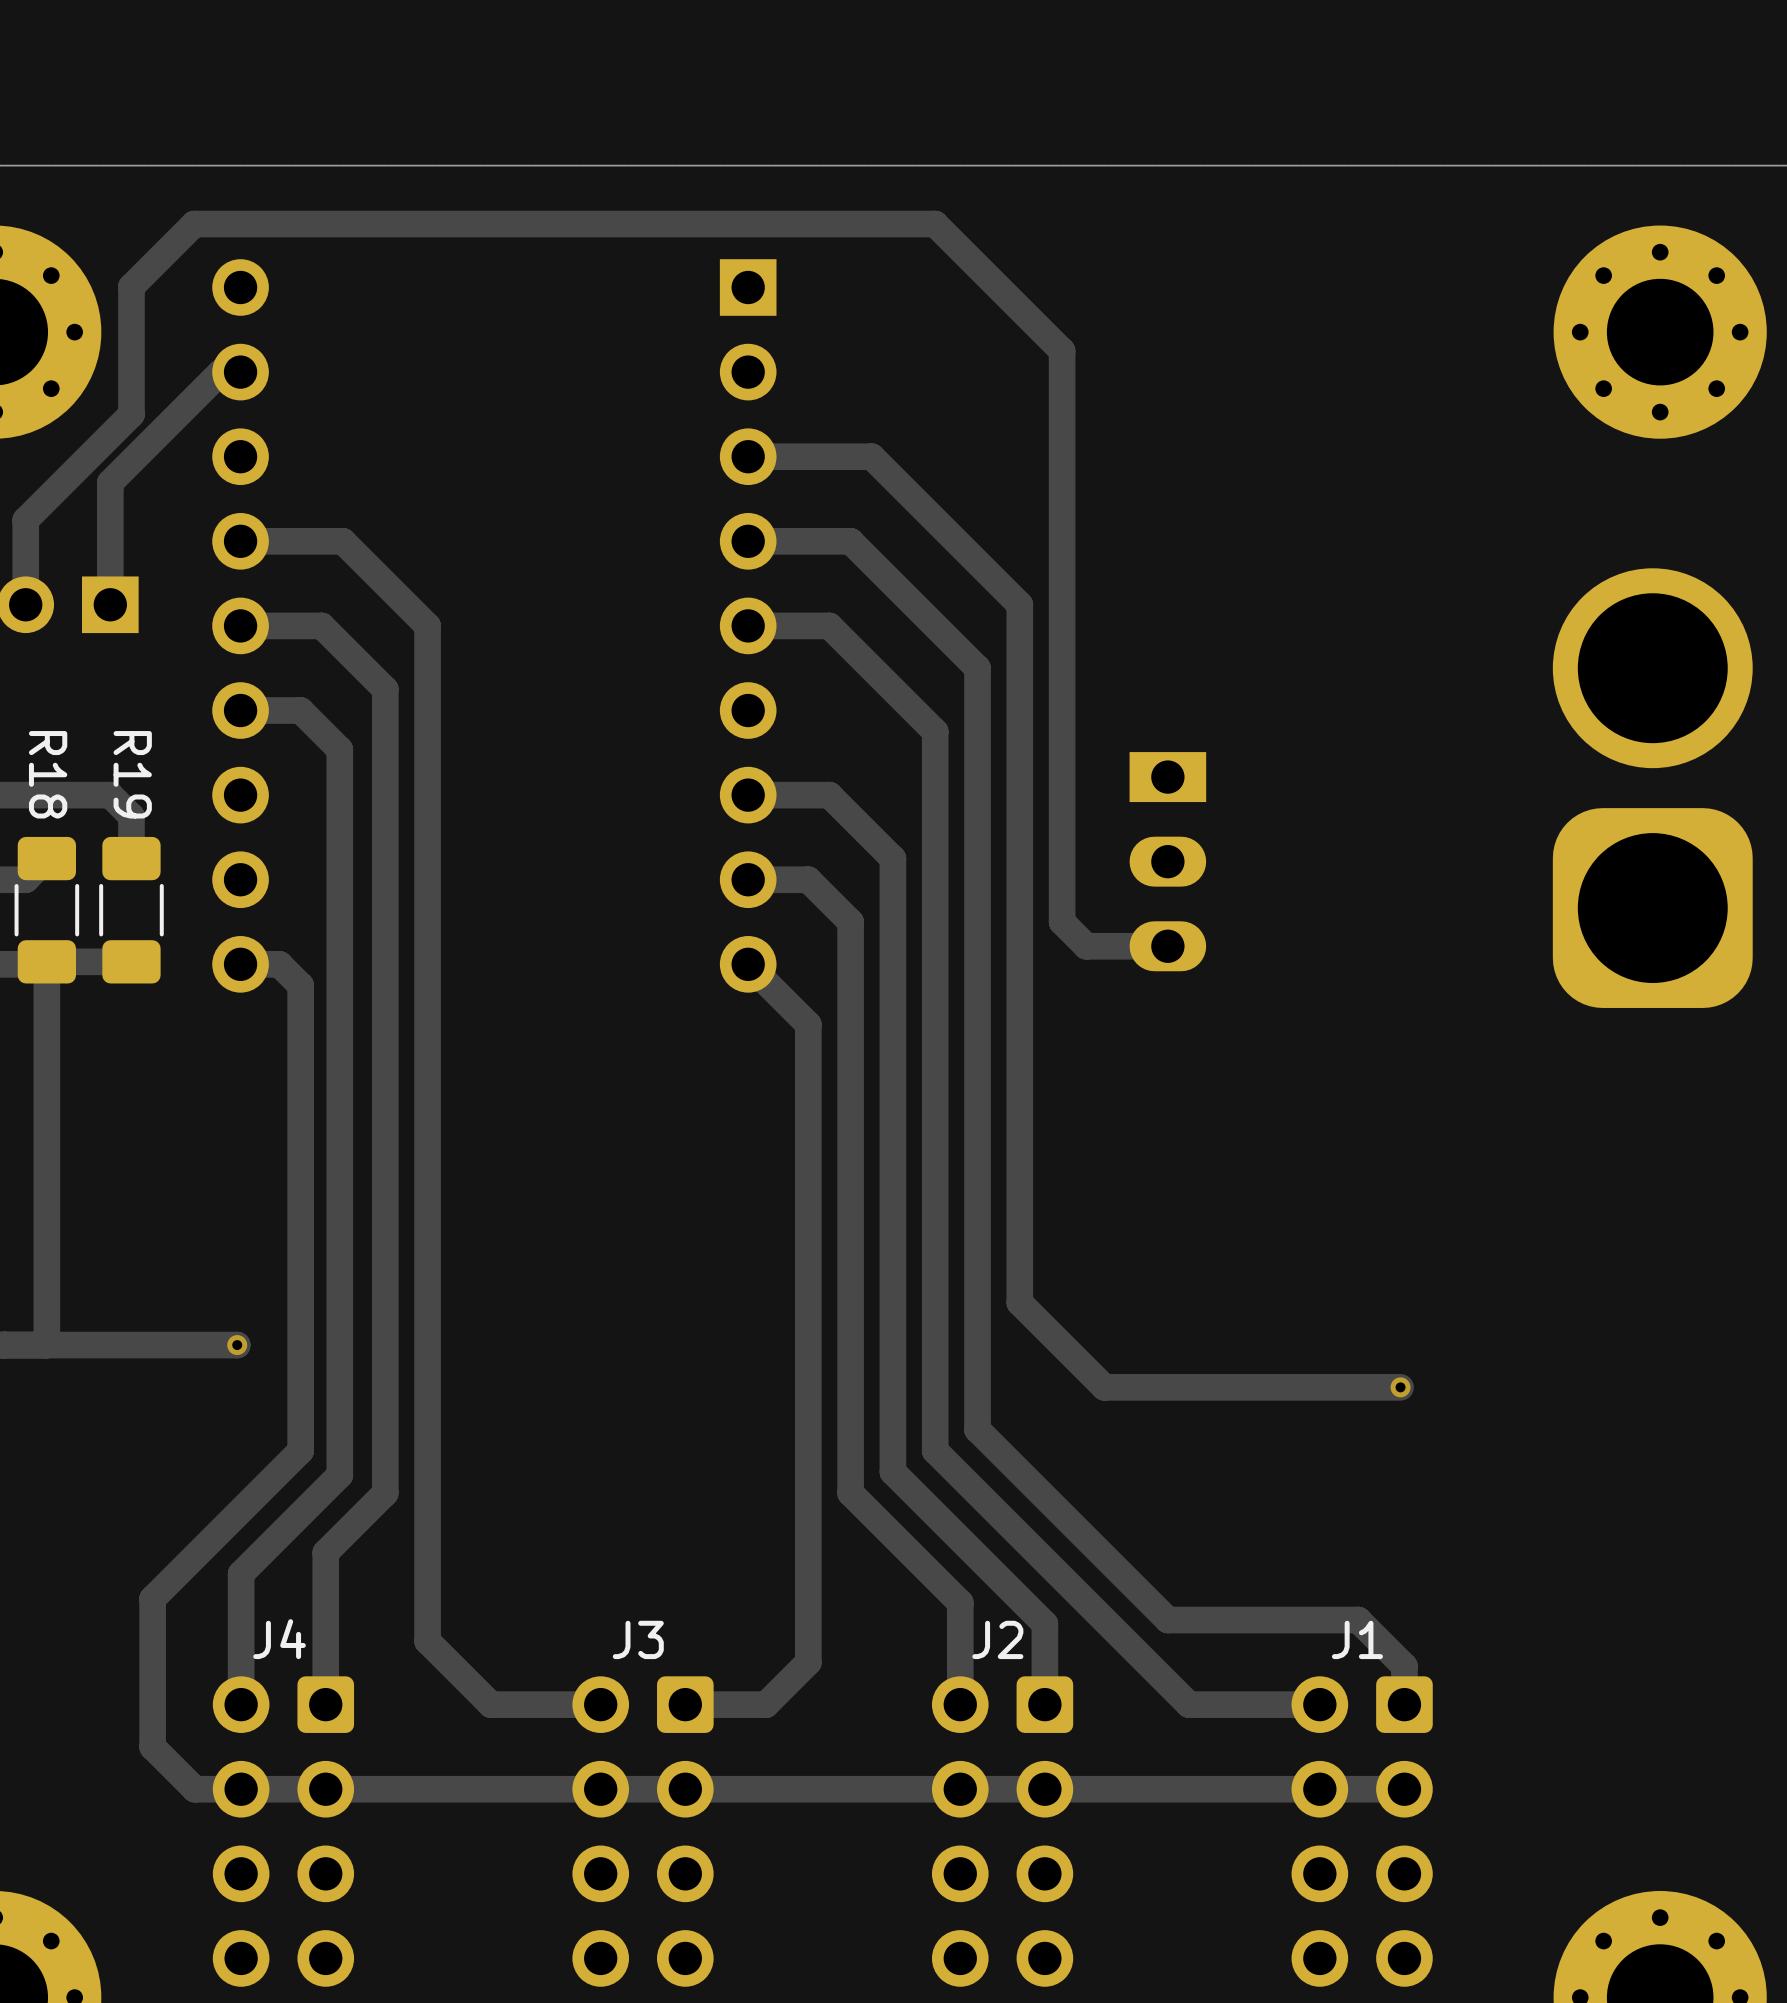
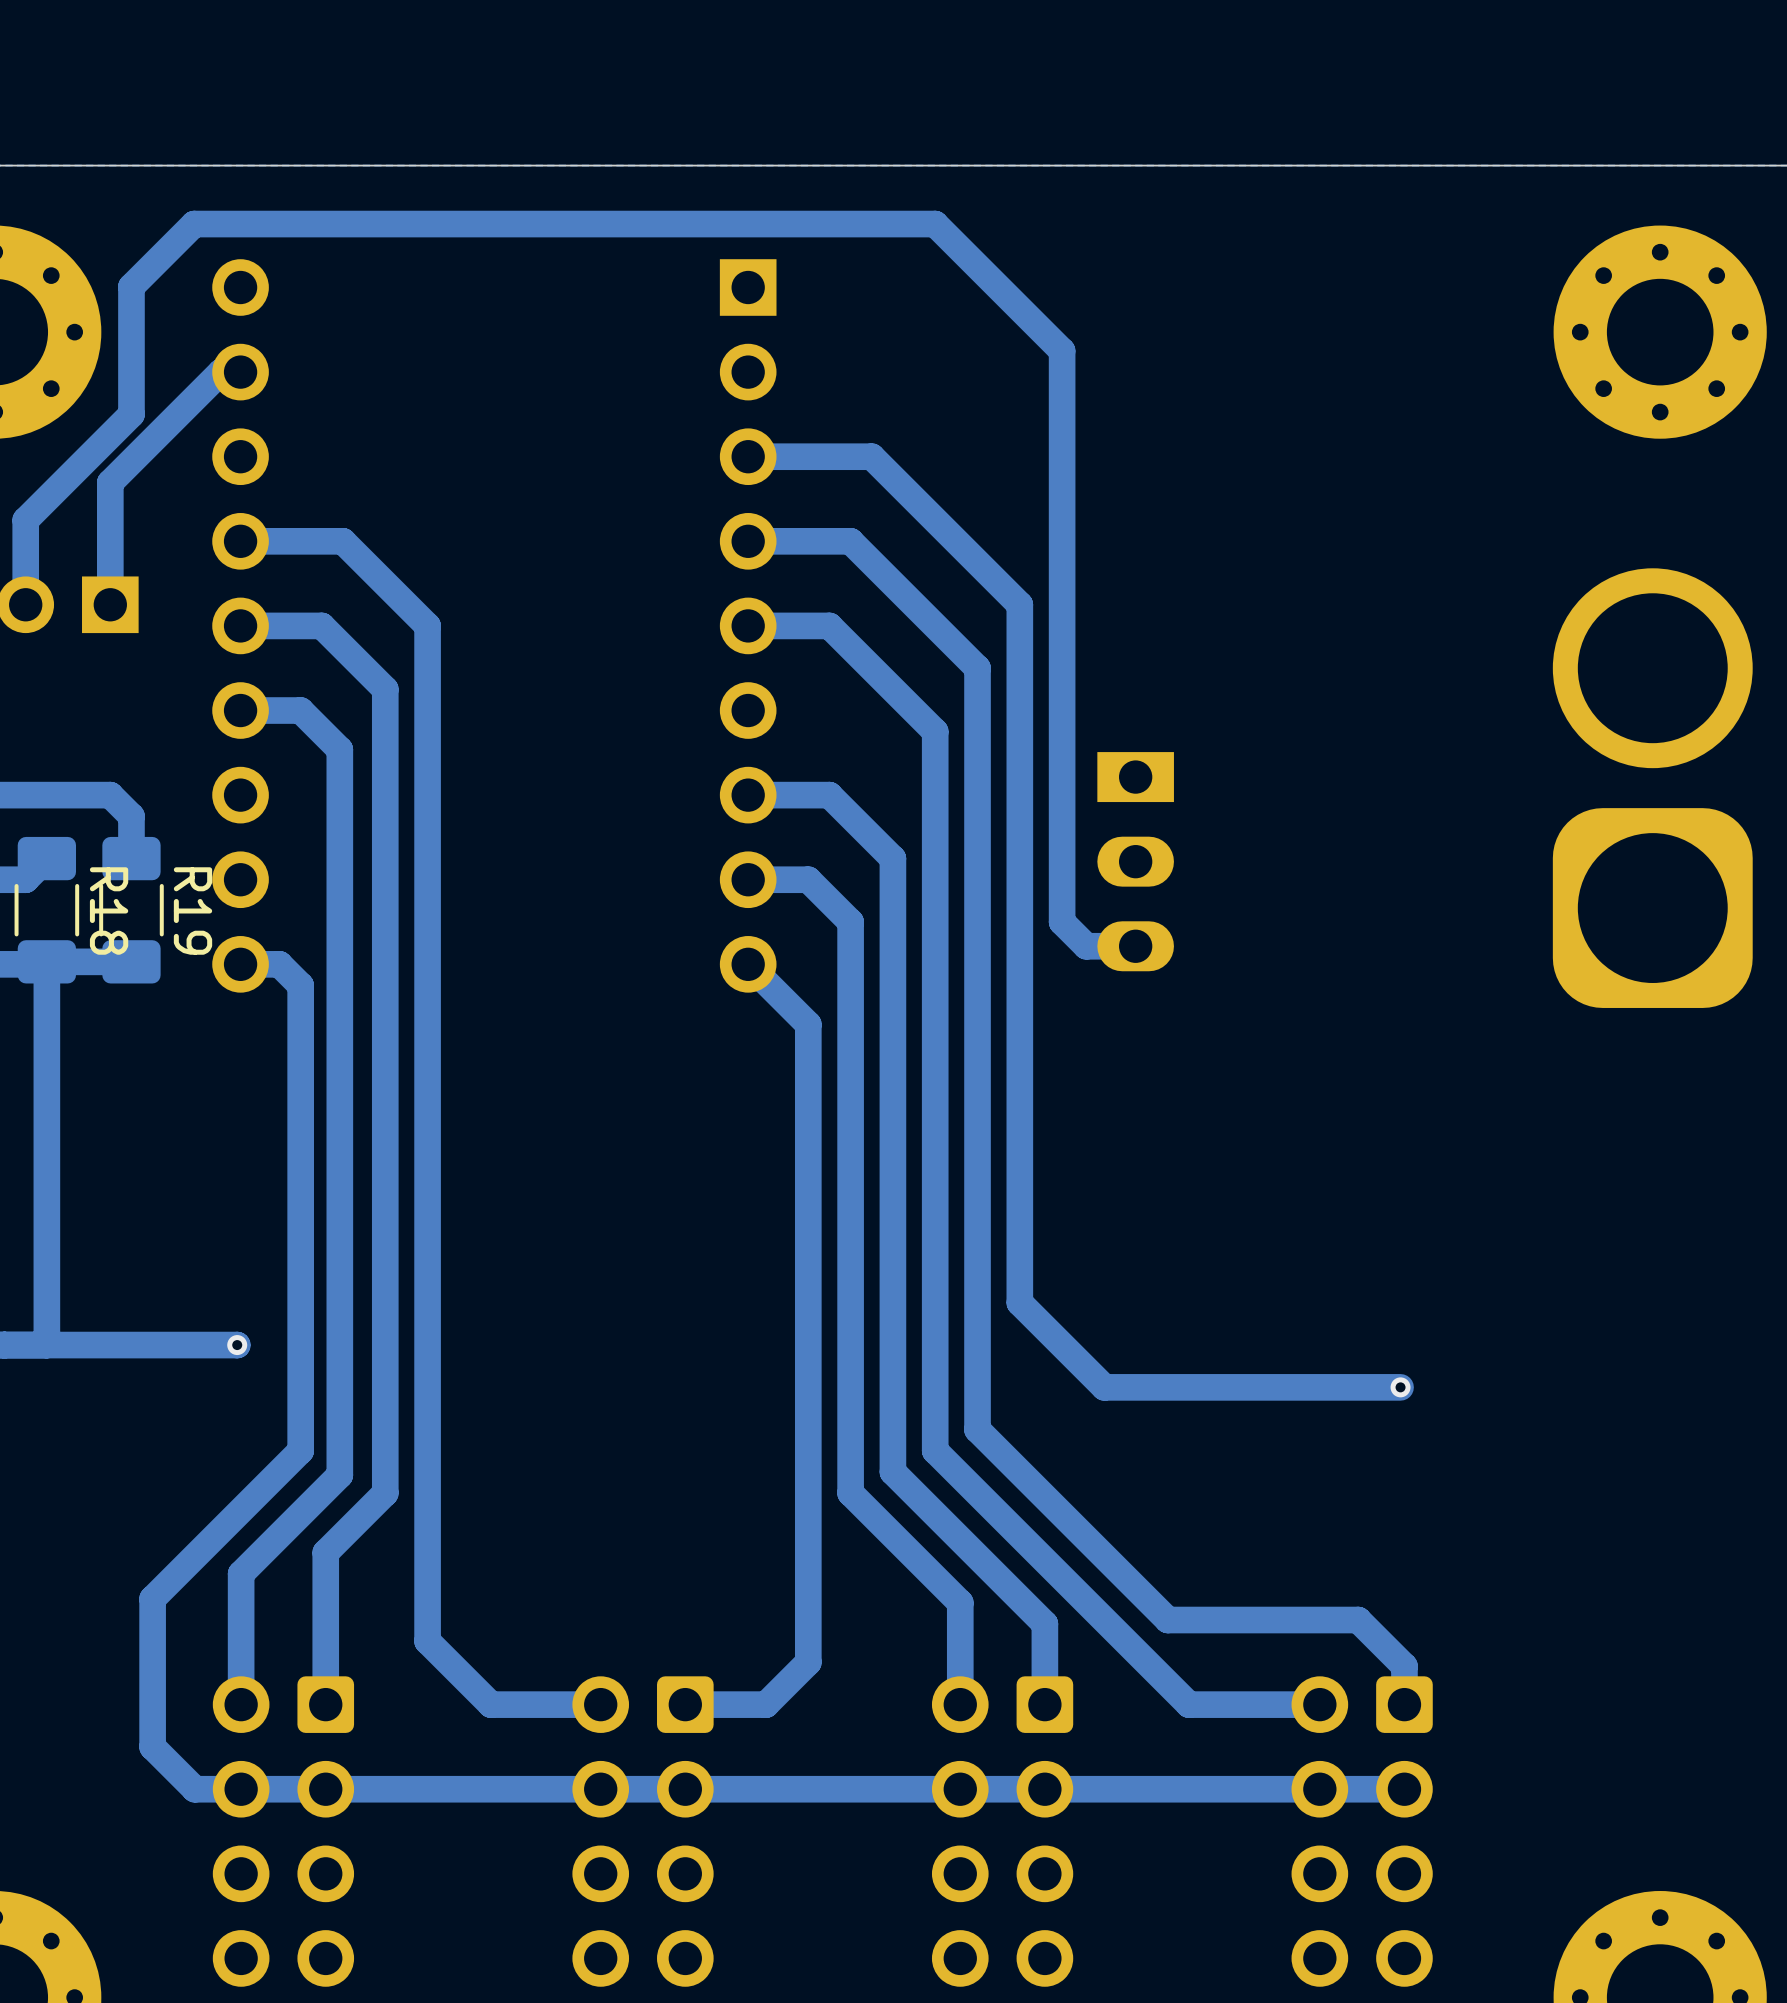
R18 name position: R18 (48, 774) -> R18 (109, 911)
R19 name position: R19 (132, 774) -> R19 (193, 911)
part position: (1167, 861) -> (1135, 861)
J4 name: J4 (279, 1639) -> none
J3 name: J3 (638, 1639) -> none
J2 name: J2 (997, 1639) -> none
J1 name: J1 (1357, 1639) -> none

